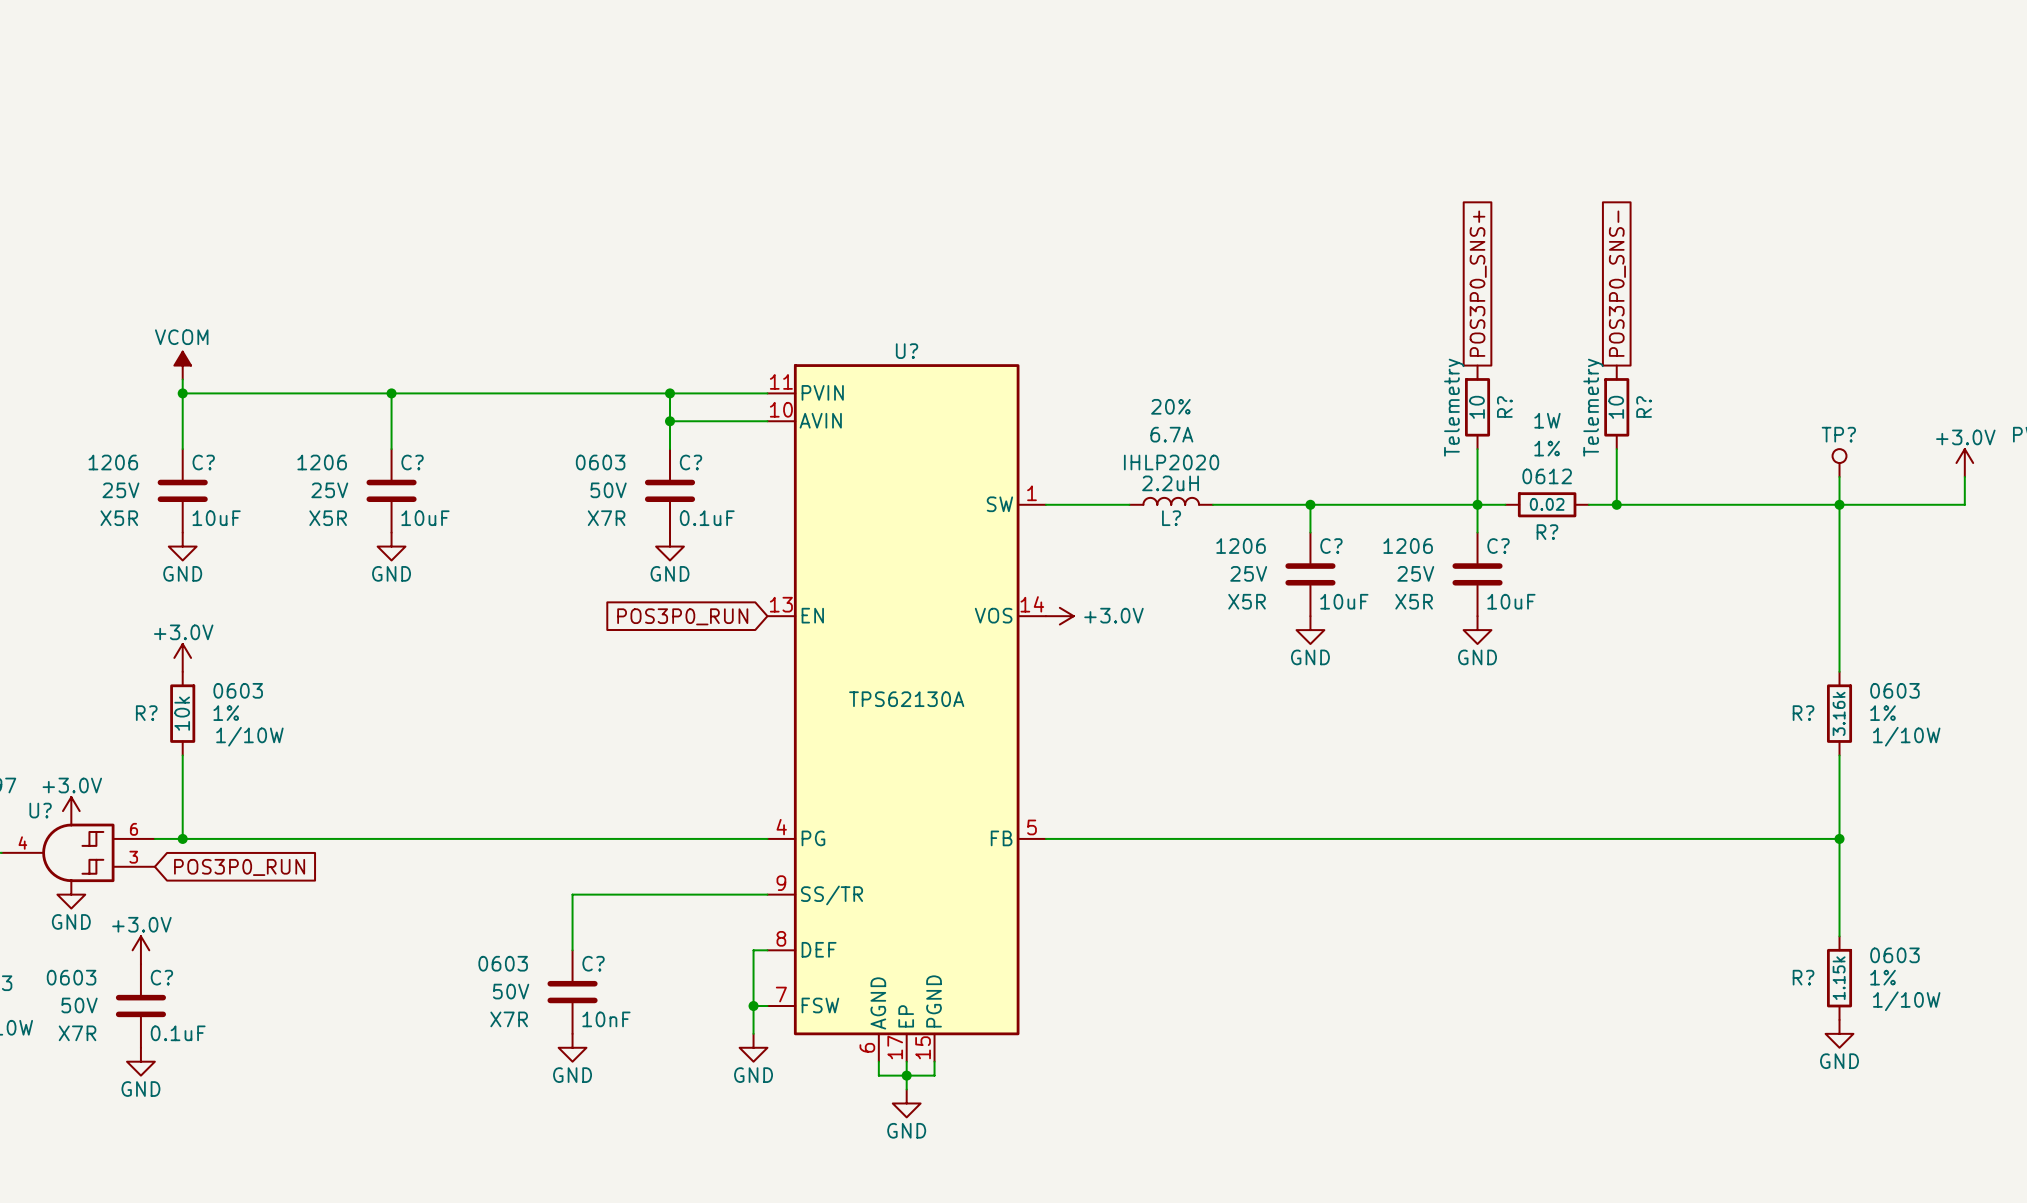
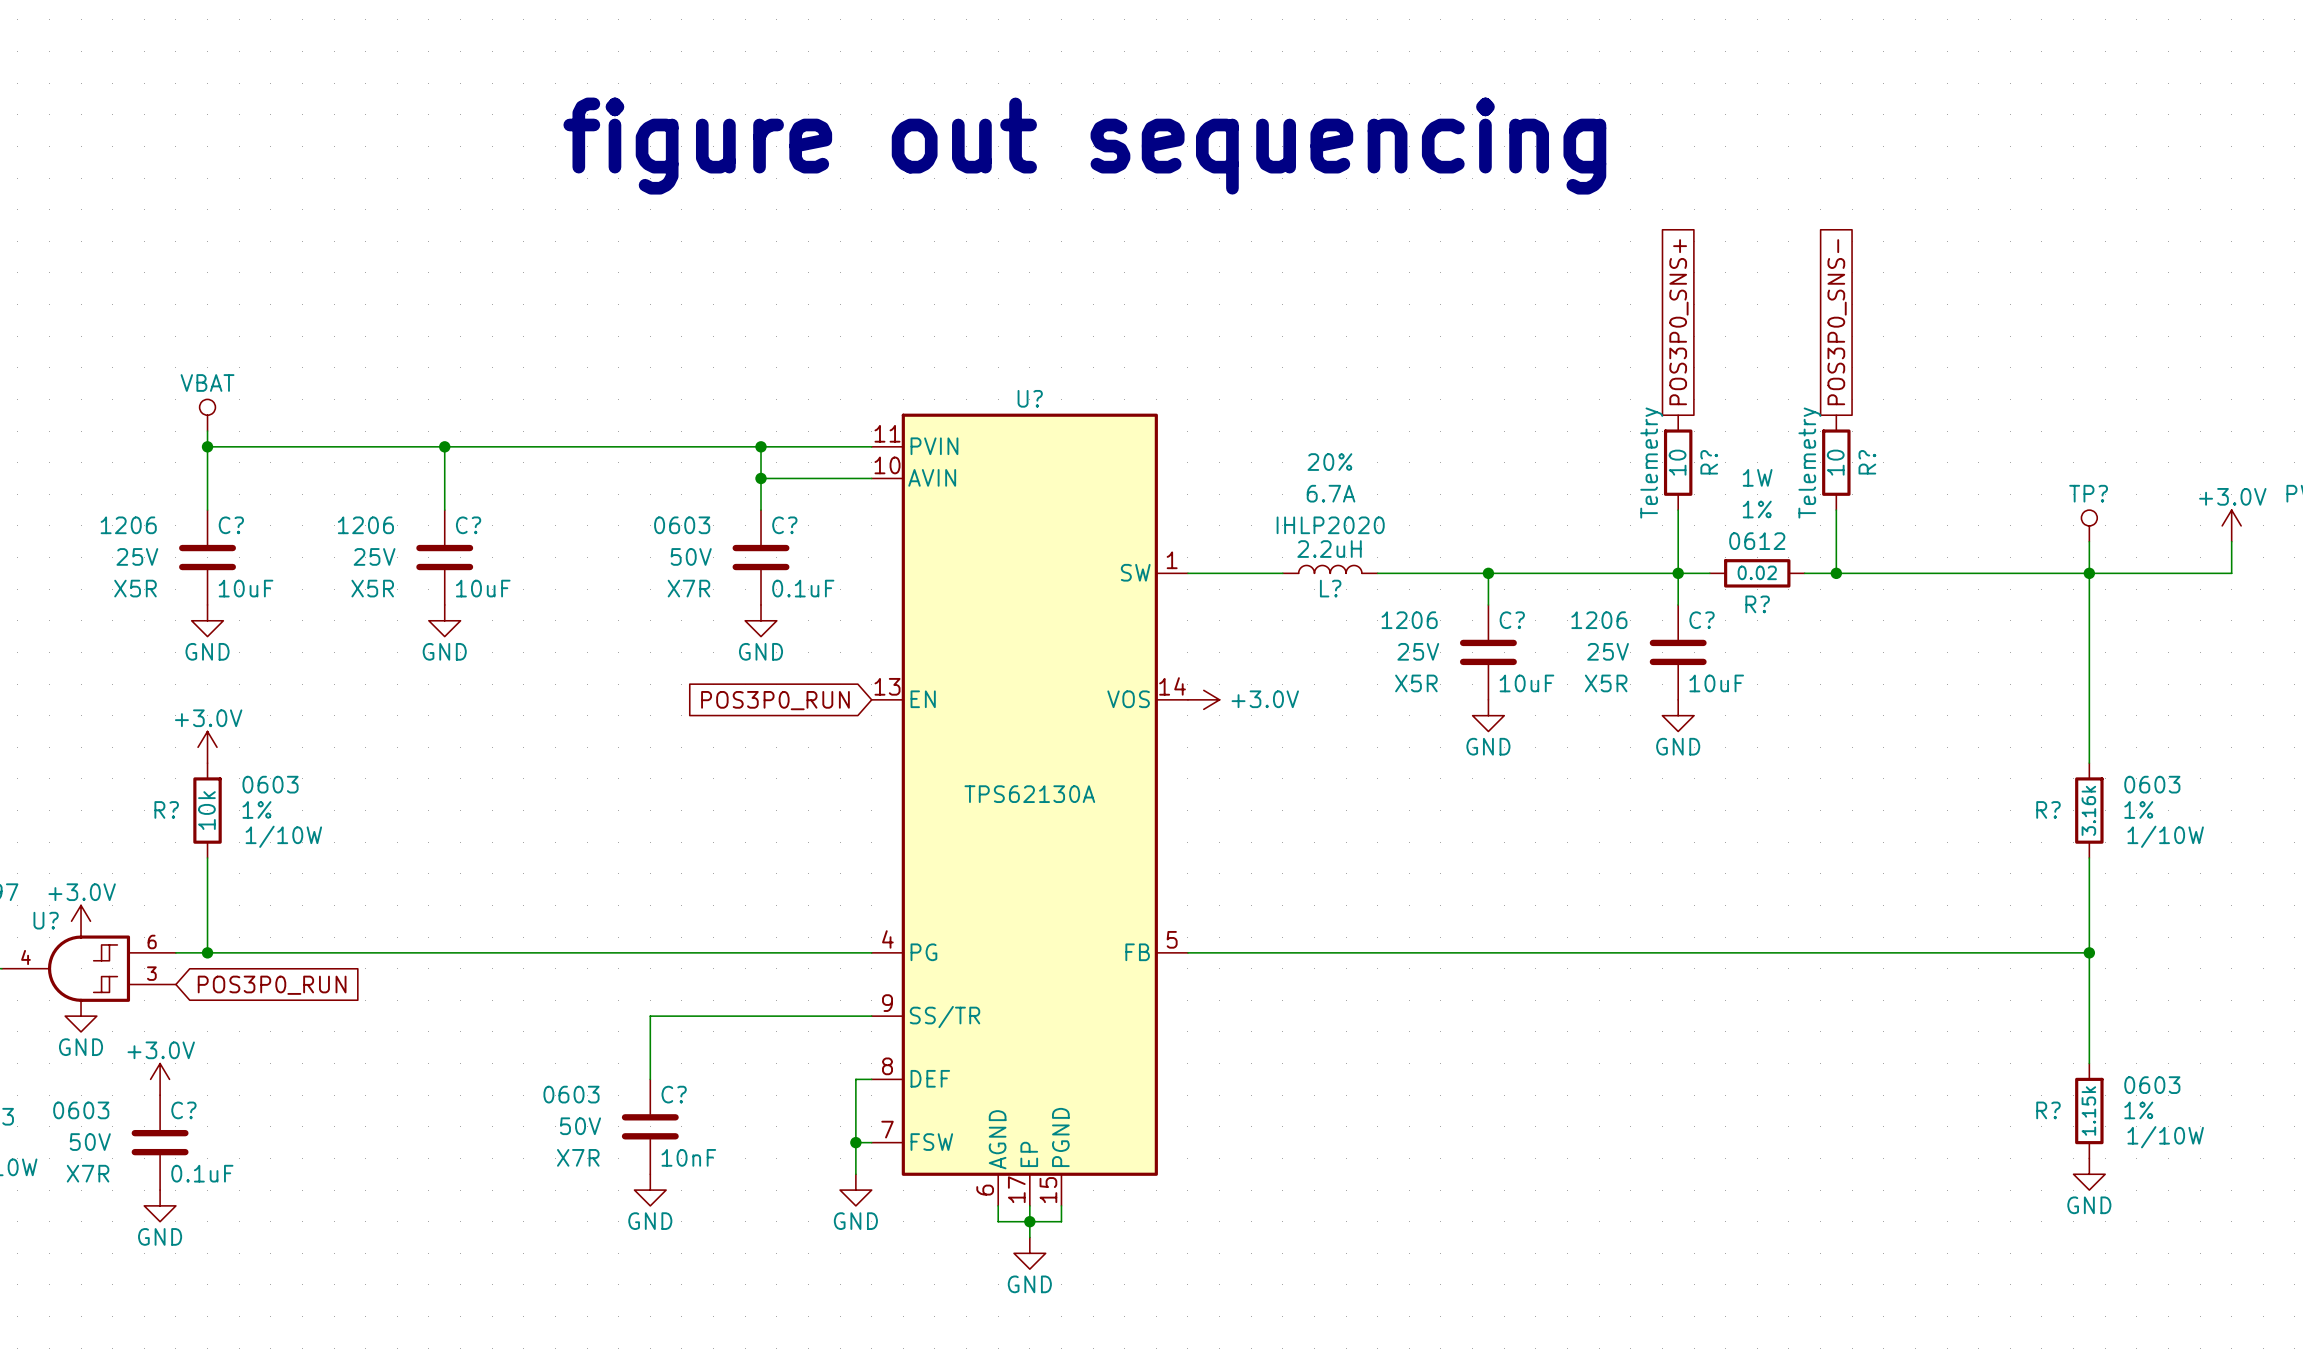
text: none -> figure out sequencing (1084, 146)
power symbol: VCOM (182, 365) -> VBAT (207, 415)

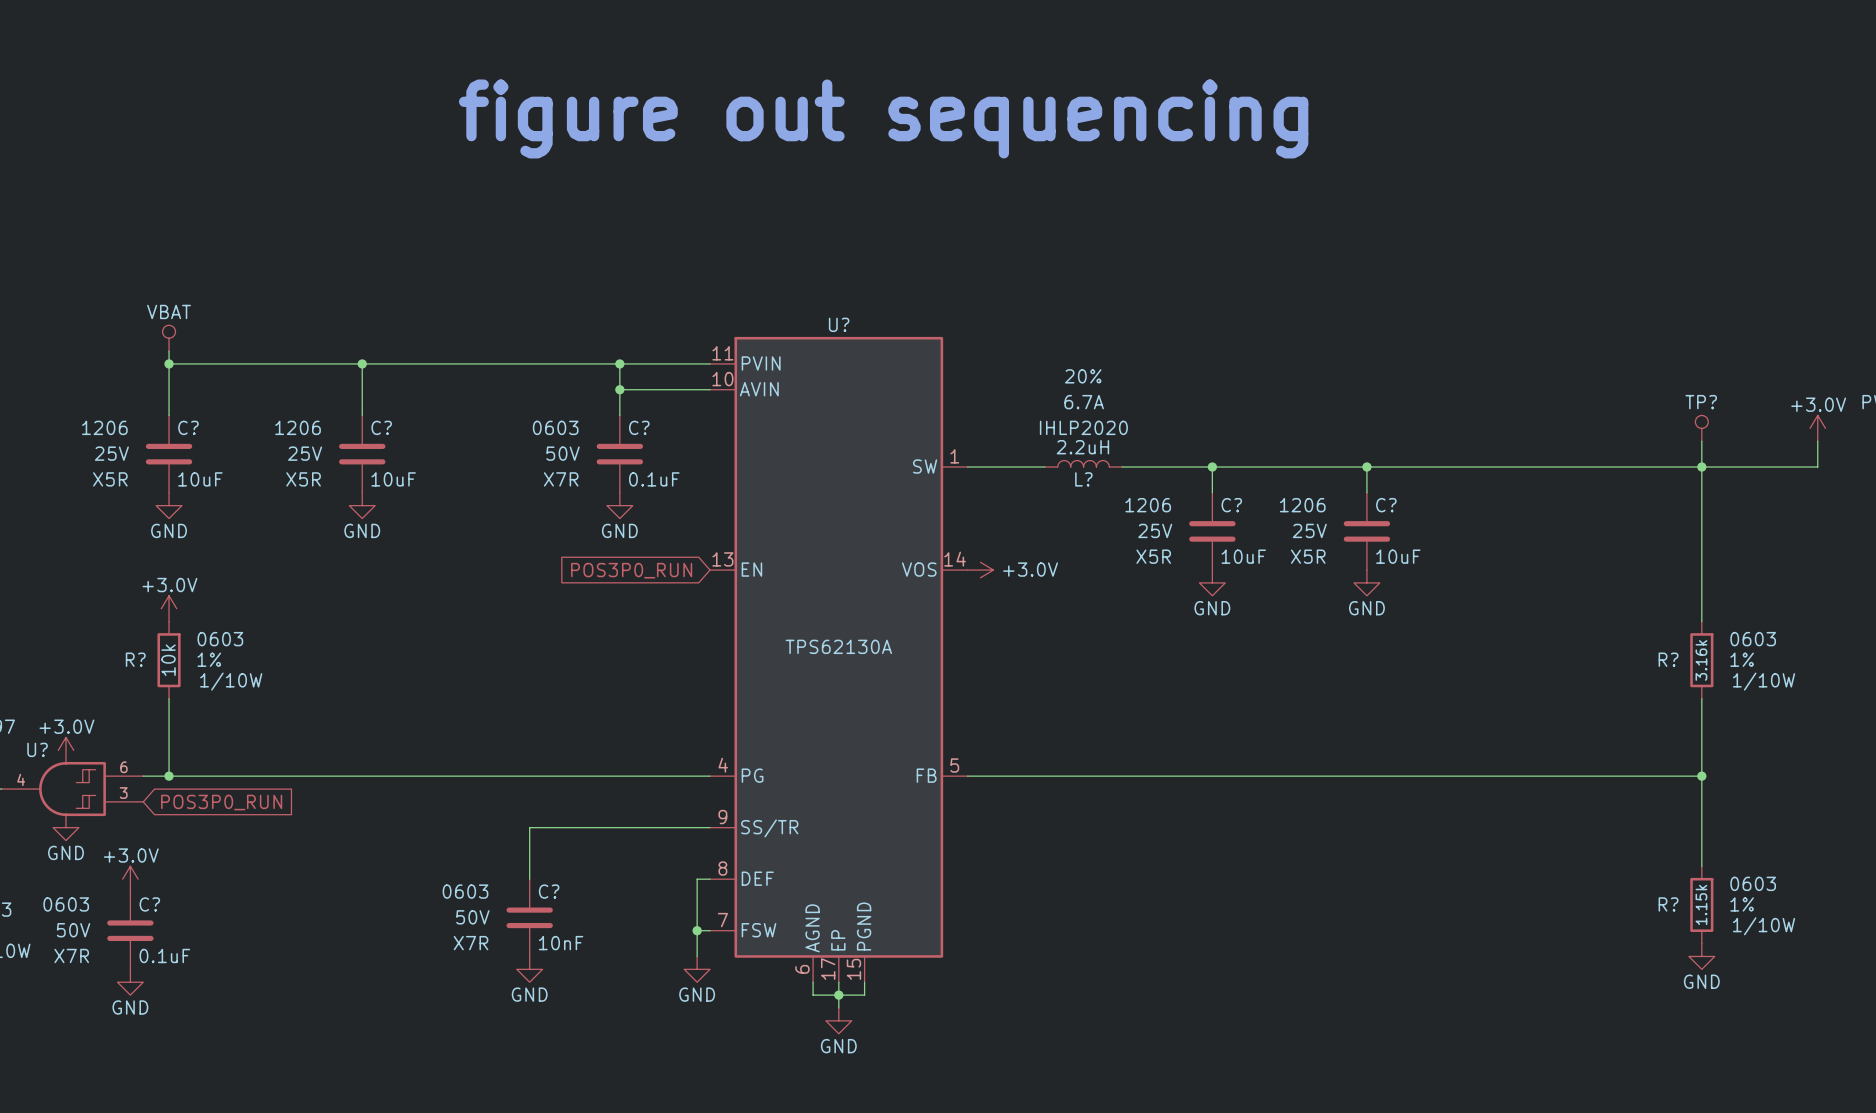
global label: POS3P0_SNS+ (1678, 322) -> none
global label: POS3P0_SNS- (1837, 322) -> none
R?: 10 (1678, 462) -> none
R?: 10 (1836, 462) -> none
wire: (1678, 510) (1678, 573) -> none
wire: (1836, 510) (1836, 573) -> none
wire: none -> (1392, 467) (1469, 467)
R?: 0.02 (1757, 573) -> none
junction: (1836, 573) -> none

